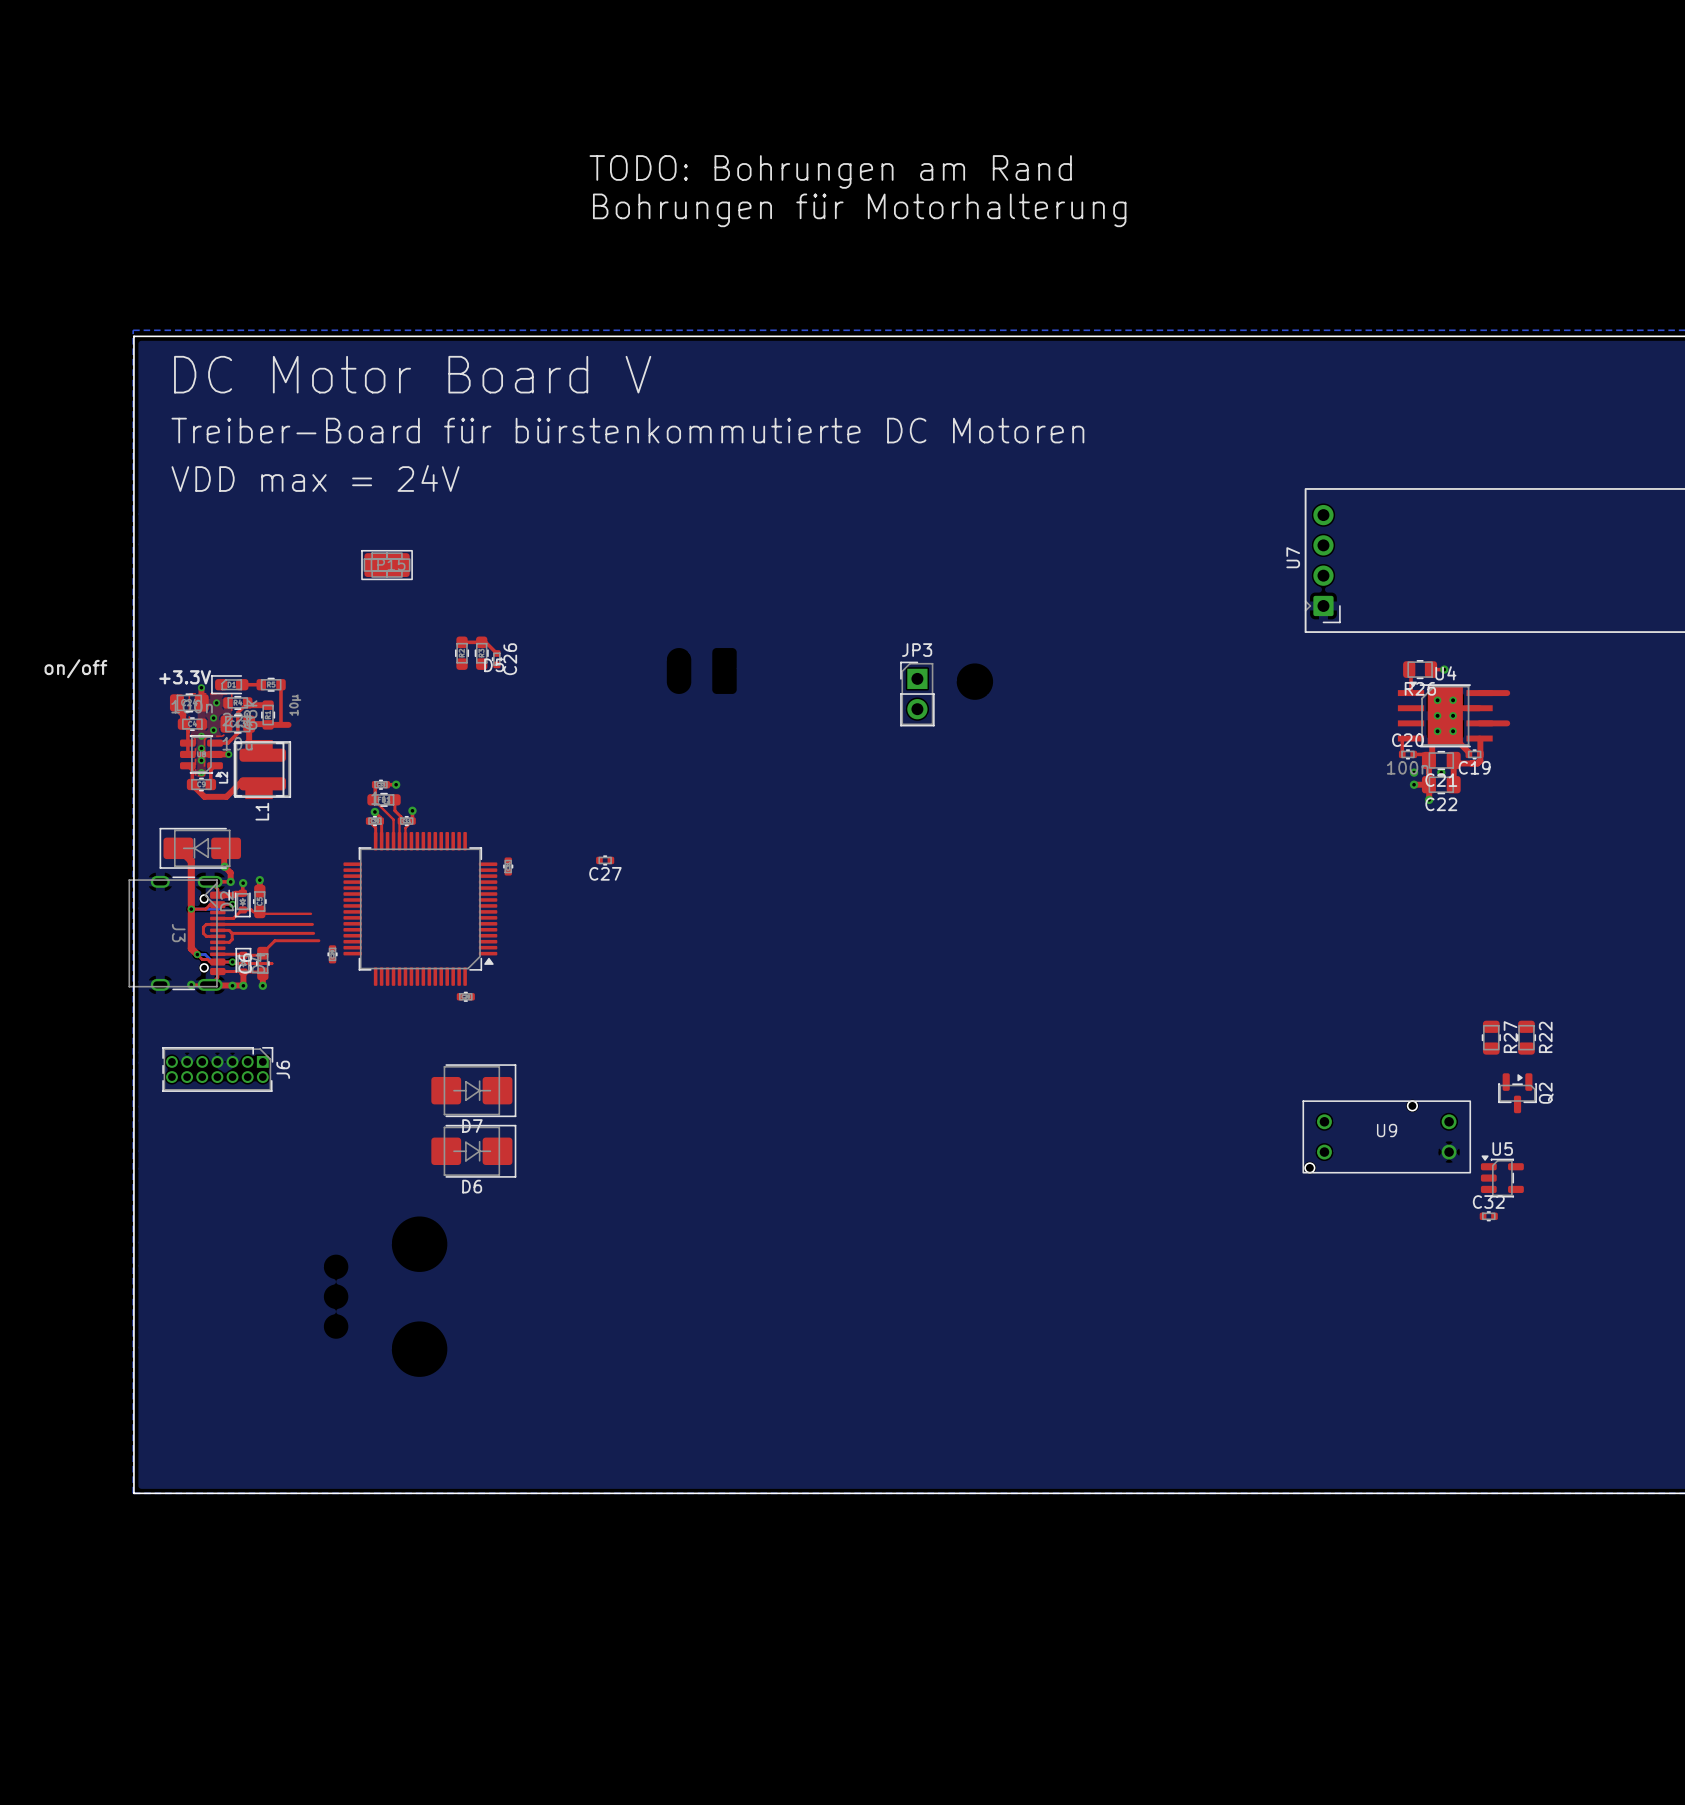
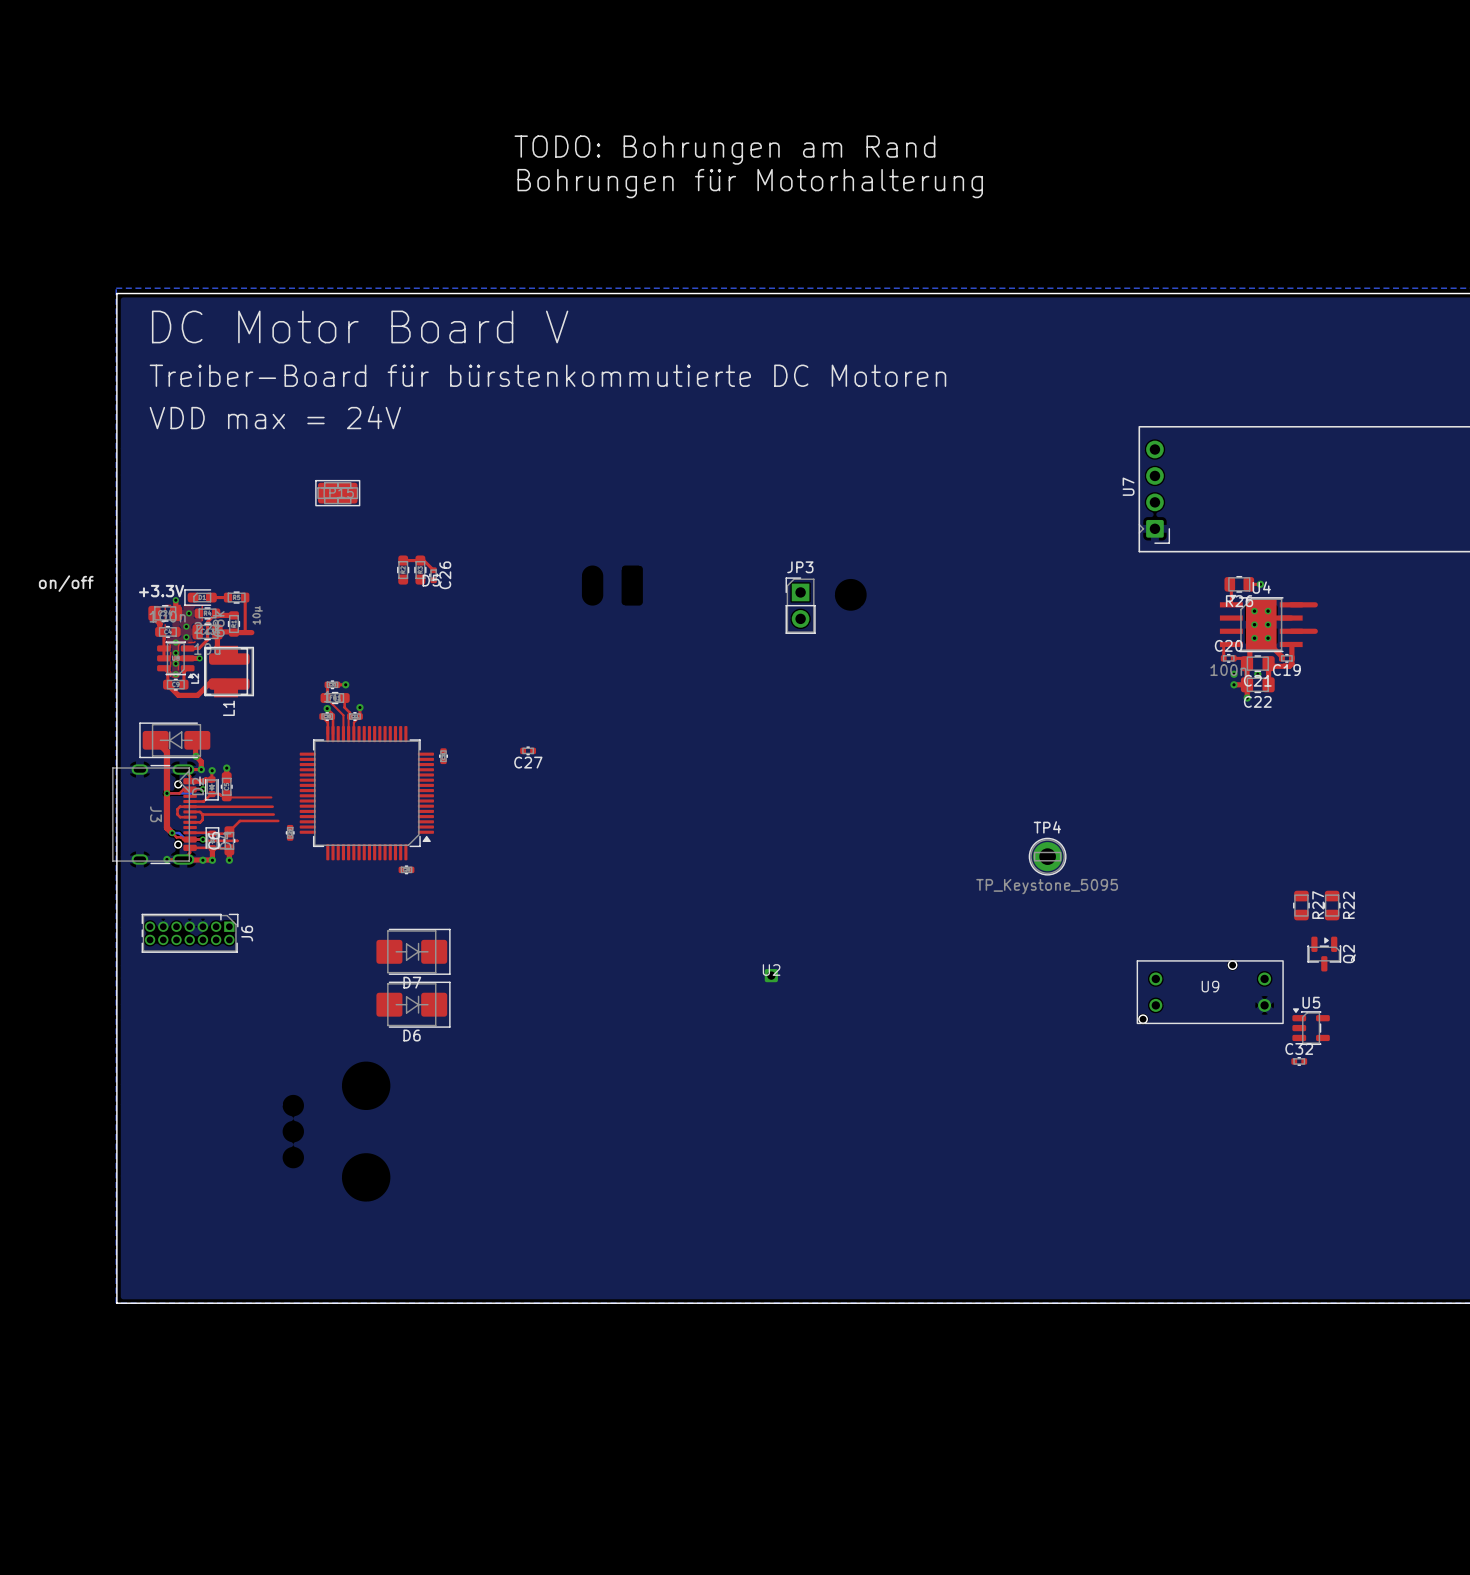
TP4: none -> TP_Keystone_5095 (1047, 856)
U2: none -> (771, 975)

